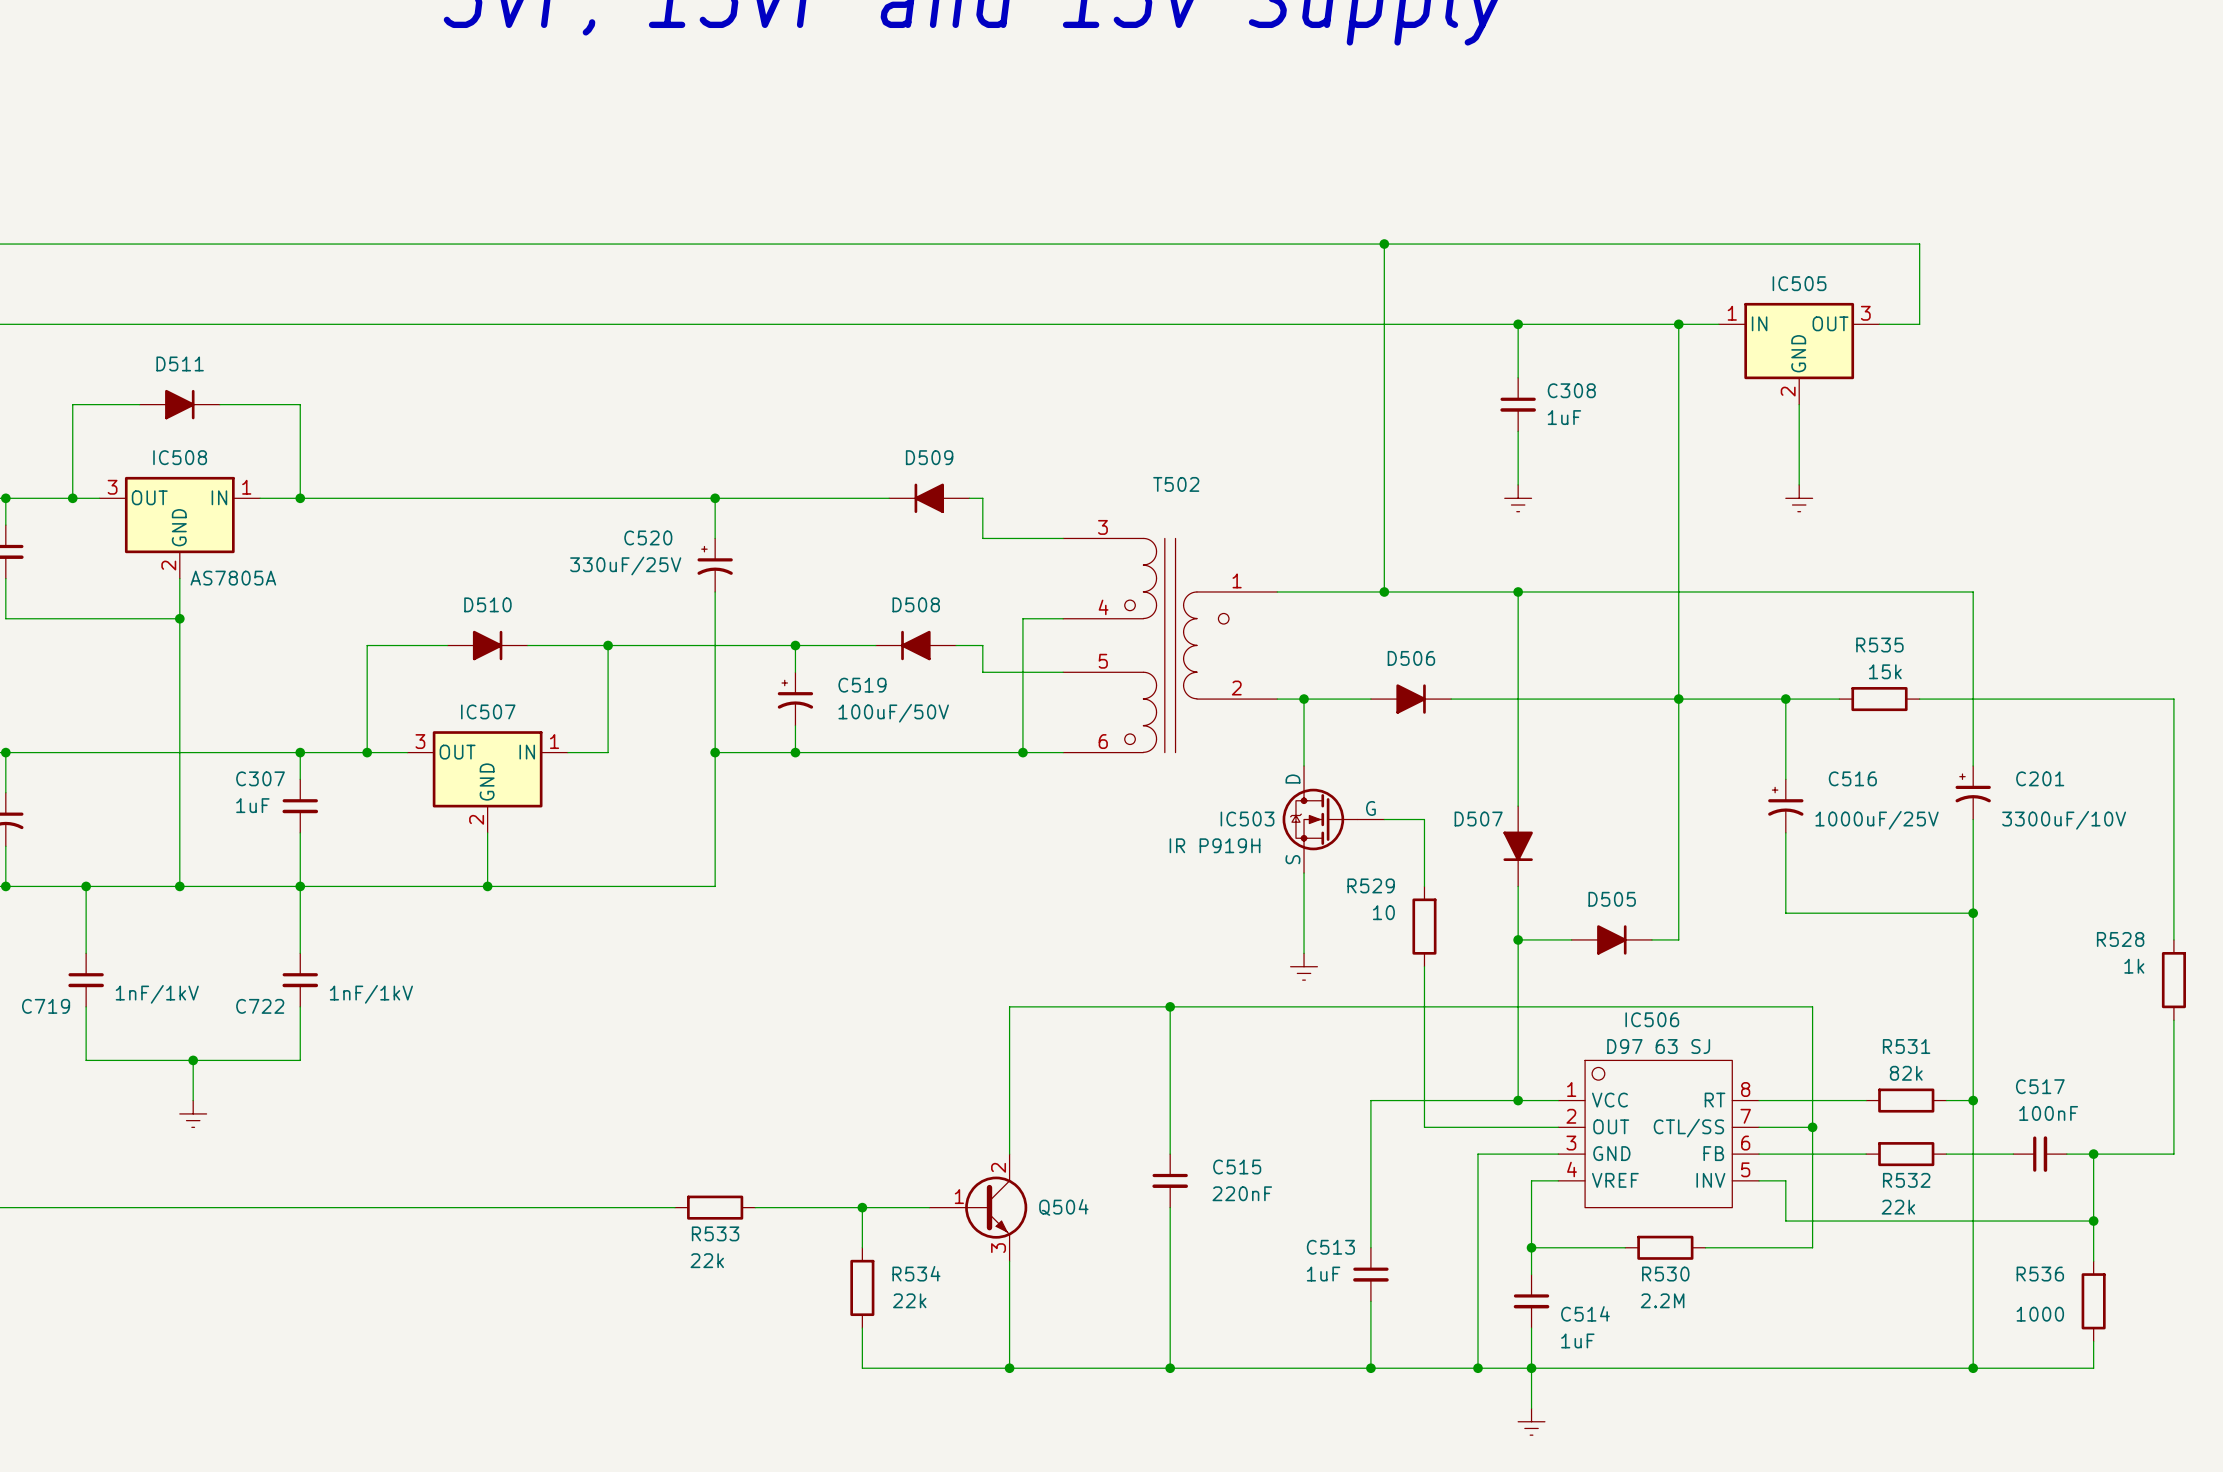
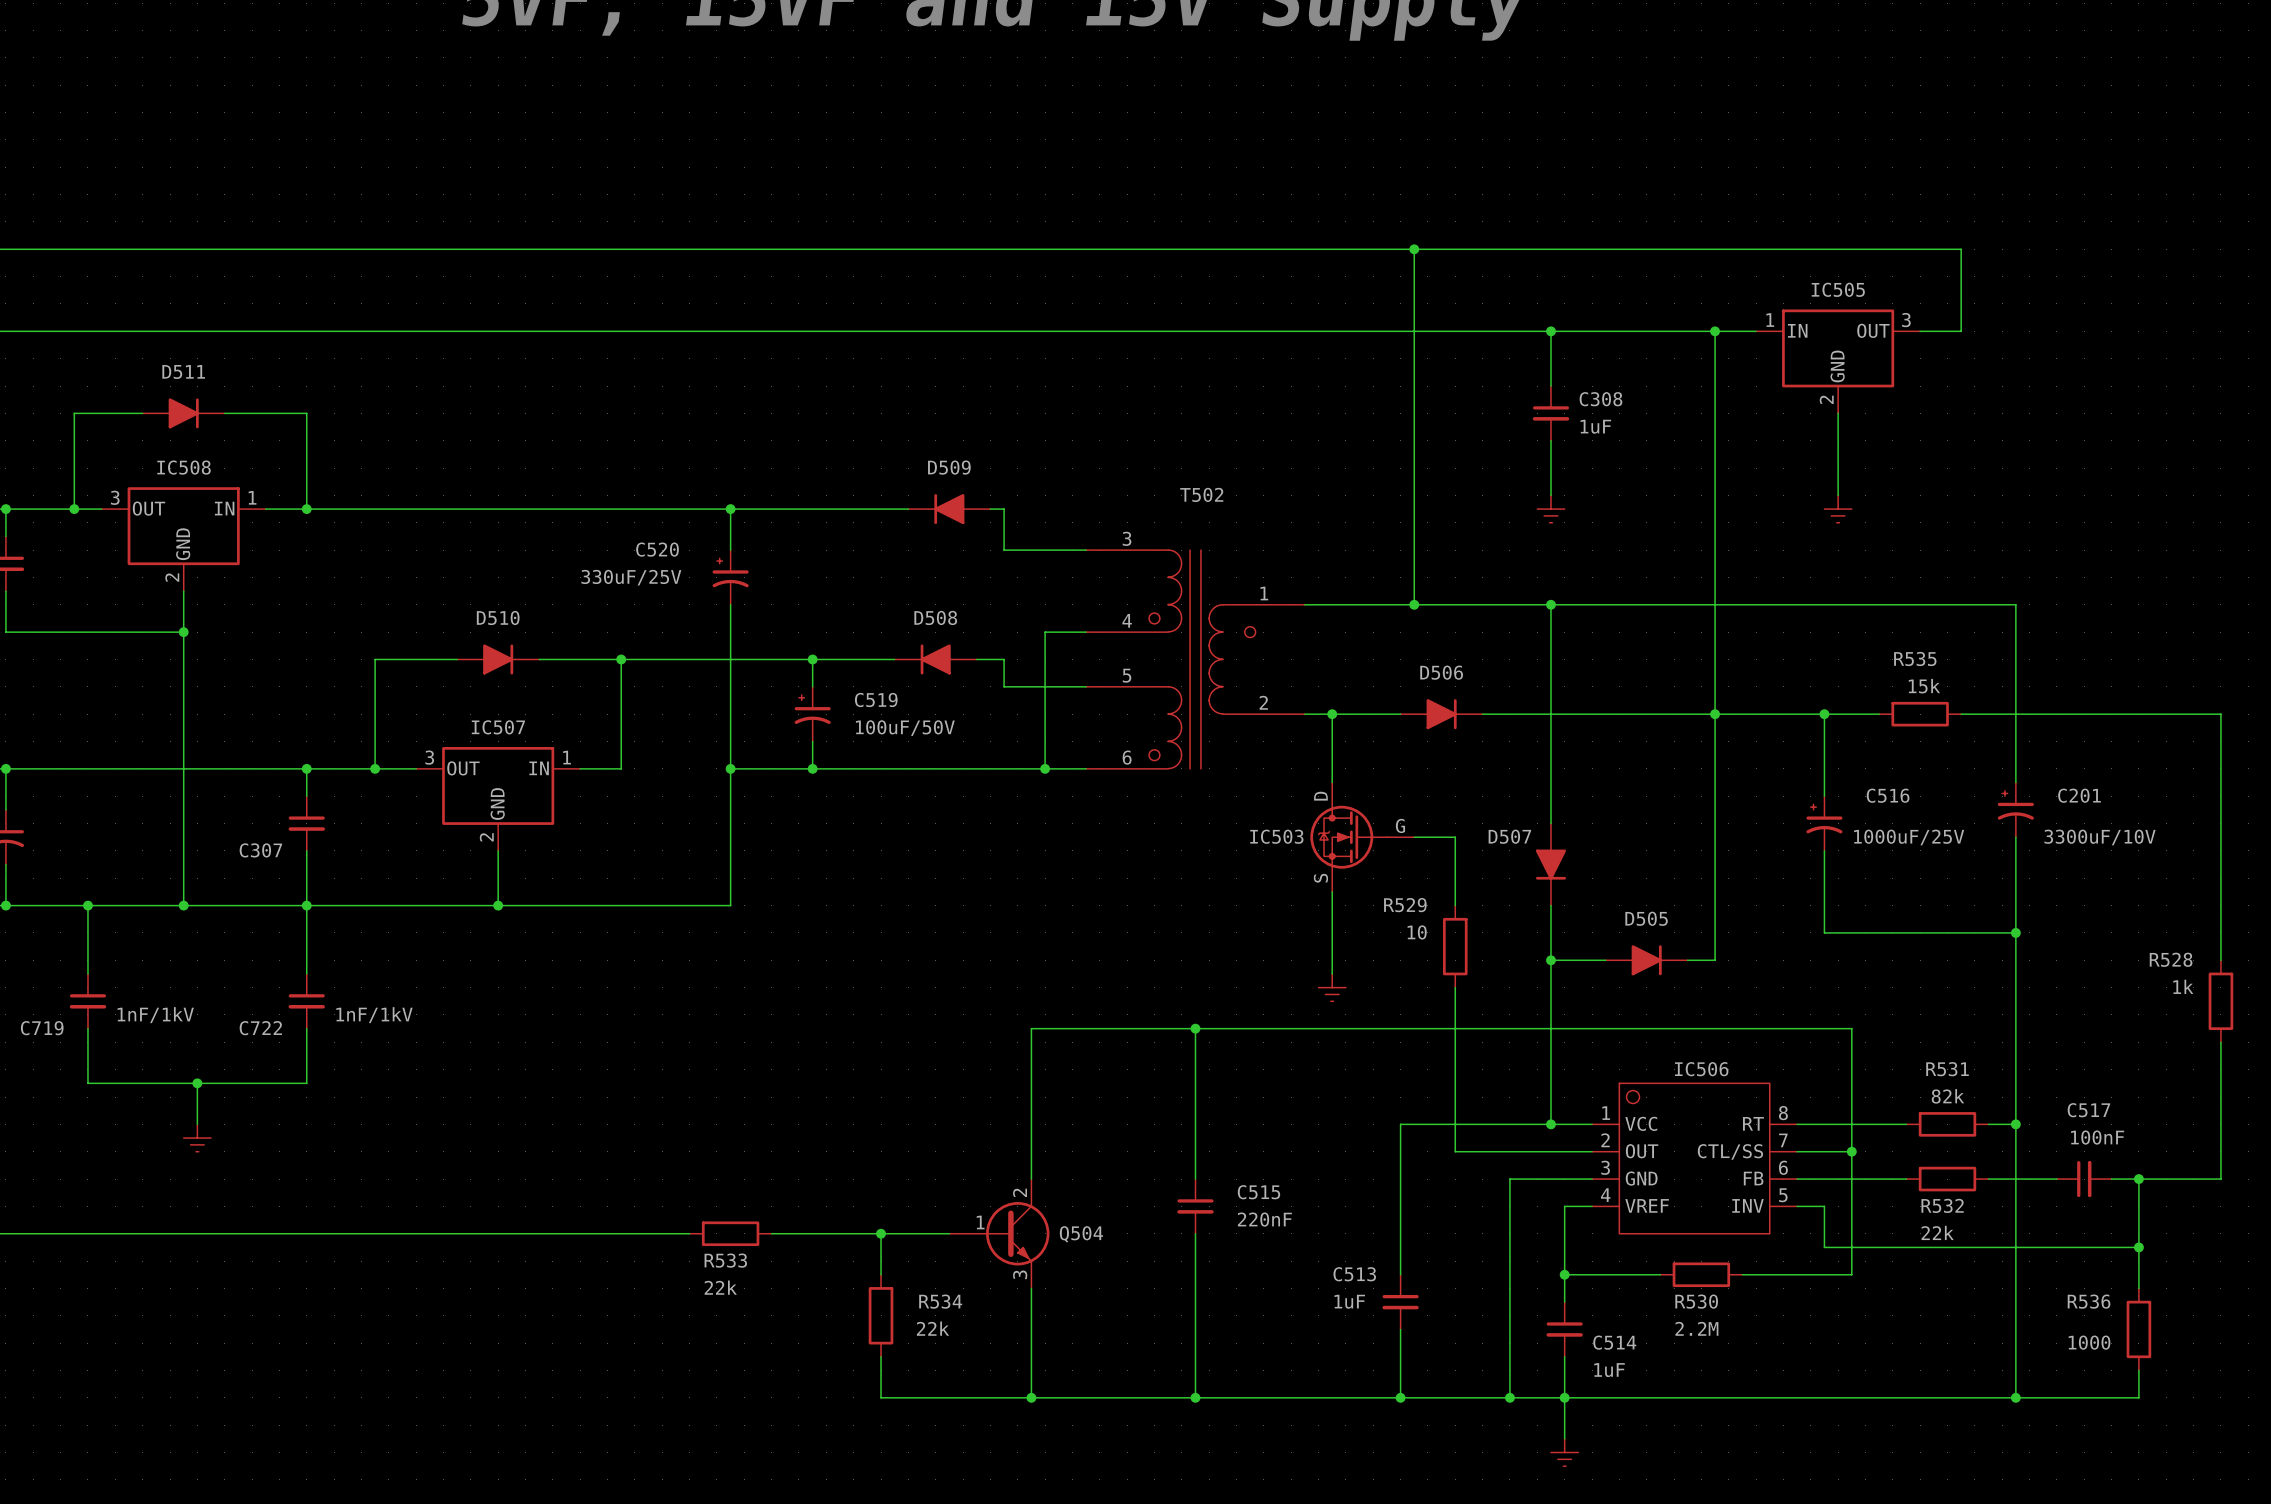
IC508 value: AS7805A (233, 578) -> none
C307 name position: C307 (260, 778) -> C307 (260, 850)
C307 value: 1uF (252, 805) -> none
IC503 value: IR P919H (1215, 845) -> none
IC506 name position: IC506 (1652, 1019) -> IC506 (1701, 1069)
IC506 value: D97 63 SJ (1658, 1046) -> none

